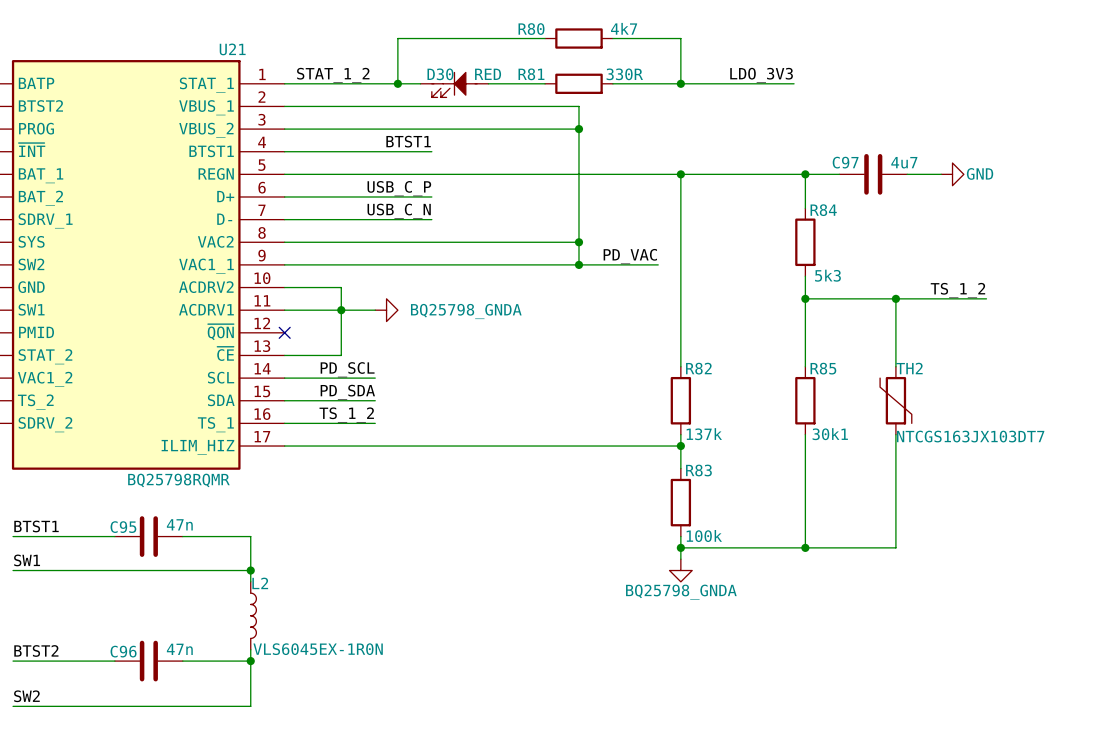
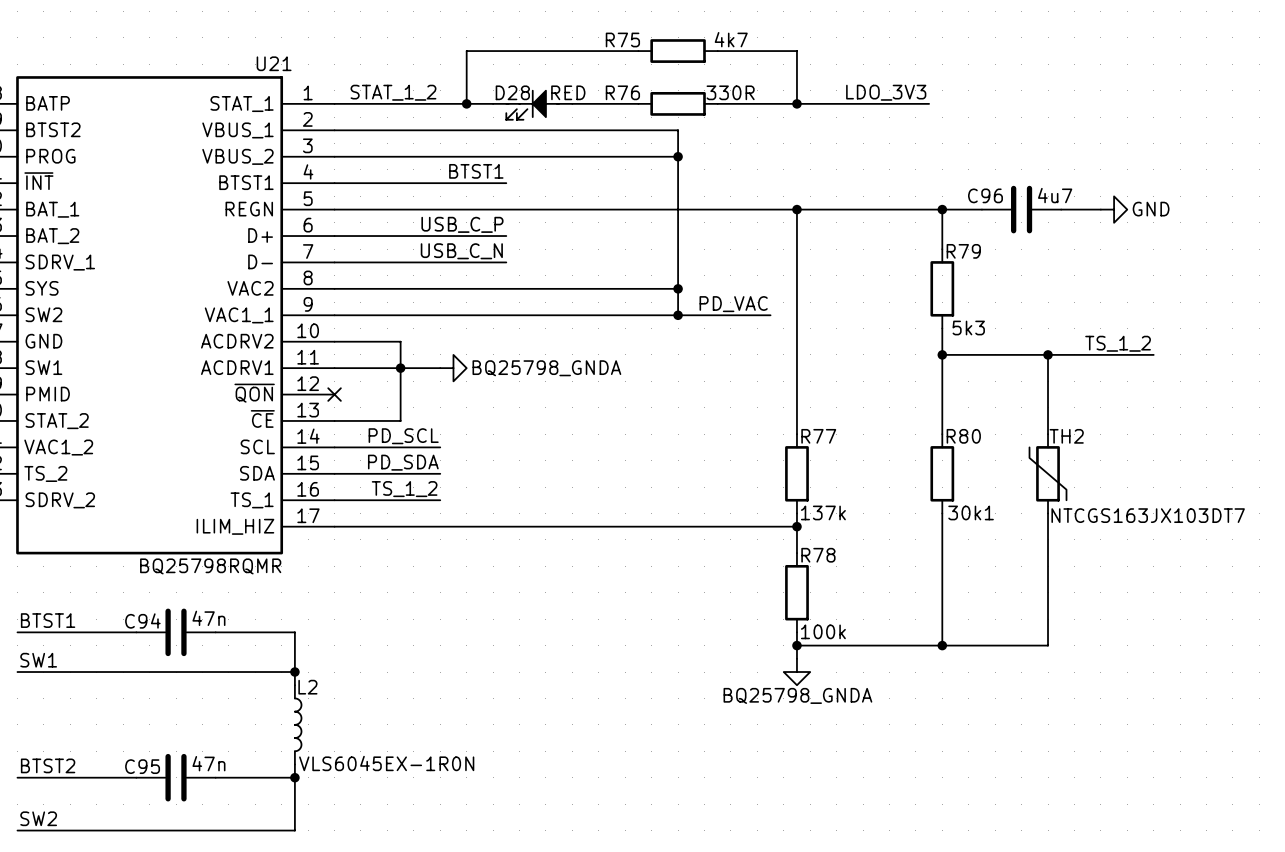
R80 name: R80 (531, 29) -> R75 (622, 39)
D30 name: D30 (440, 74) -> D28 (512, 92)
R81 name: R81 (531, 74) -> R76 (622, 92)
C97 name: C97 (845, 162) -> C96 (985, 195)
R84 name: R84 (823, 210) -> R79 (963, 251)
R82 name: R82 (698, 368) -> R77 (818, 436)
R85 name: R85 (823, 368) -> R80 (963, 436)
R83 name: R83 (698, 470) -> R78 (818, 555)
C95 name: C95 (123, 527) -> C94 (142, 620)
C96 name: C96 (123, 651) -> C95 (142, 766)

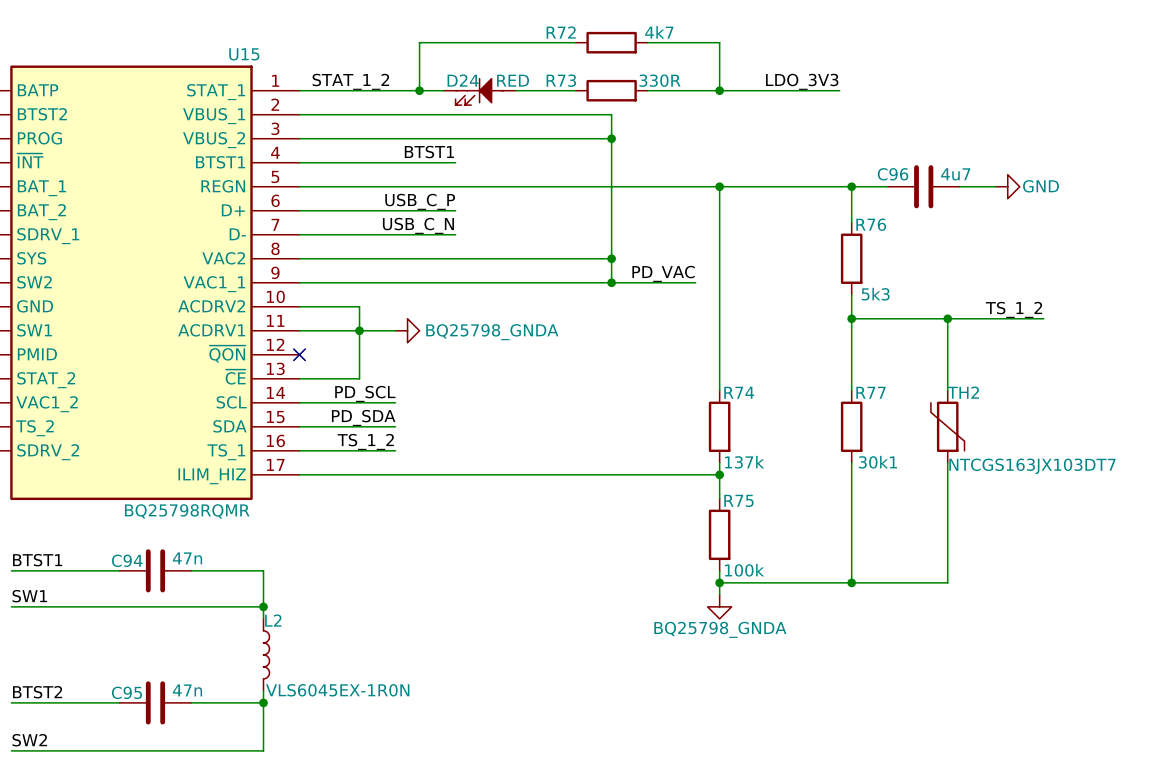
R75 name: R75 (622, 39) -> R72 (561, 32)
U21 name: U21 (274, 63) -> U15 (244, 54)
D28 name: D28 (512, 92) -> D24 (463, 80)
R76 name: R76 (622, 92) -> R73 (561, 80)
R79 name: R79 (963, 251) -> R76 (871, 224)
R77 name: R77 (818, 436) -> R74 (739, 392)
R80 name: R80 (963, 436) -> R77 (871, 392)
R78 name: R78 (818, 555) -> R75 (738, 500)

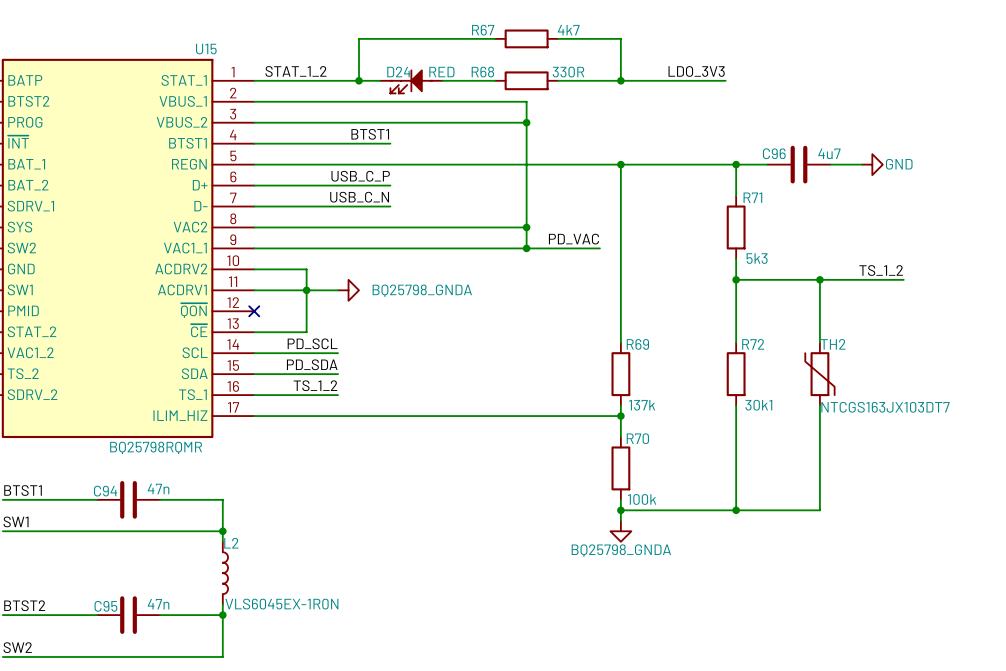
R72 name: R72 (561, 32) -> R67 (483, 30)
R73 name: R73 (561, 80) -> R68 (482, 72)
R76 name: R76 (871, 224) -> R71 (752, 197)
R74 name: R74 (739, 392) -> R69 (637, 344)
R77 name: R77 (871, 392) -> R72 (753, 344)
R75 name: R75 (738, 500) -> R70 (637, 438)

